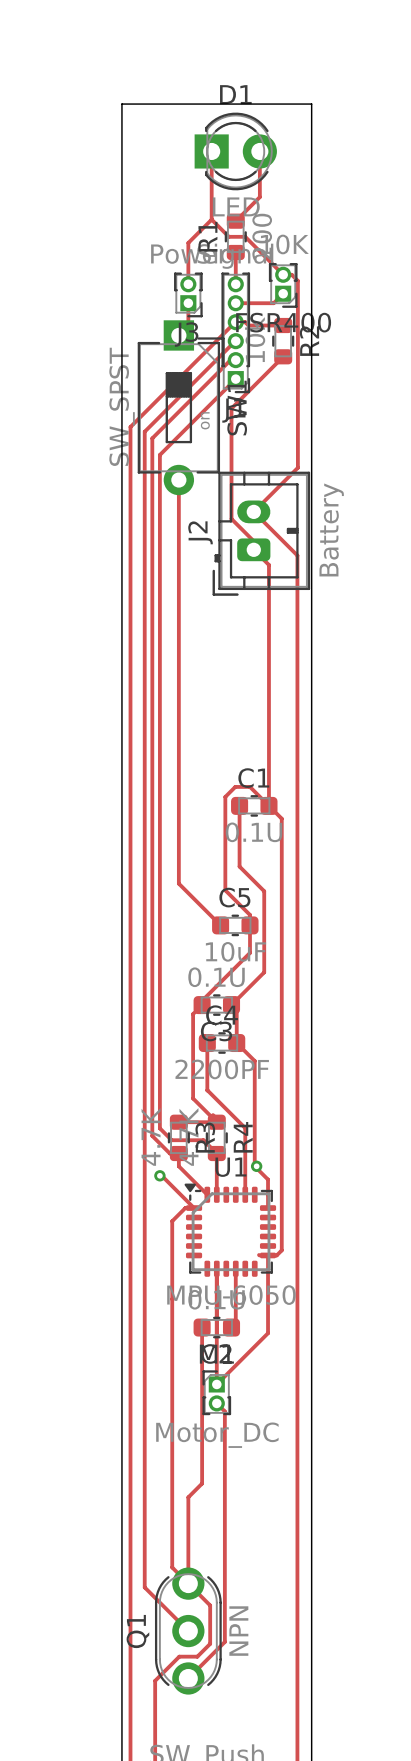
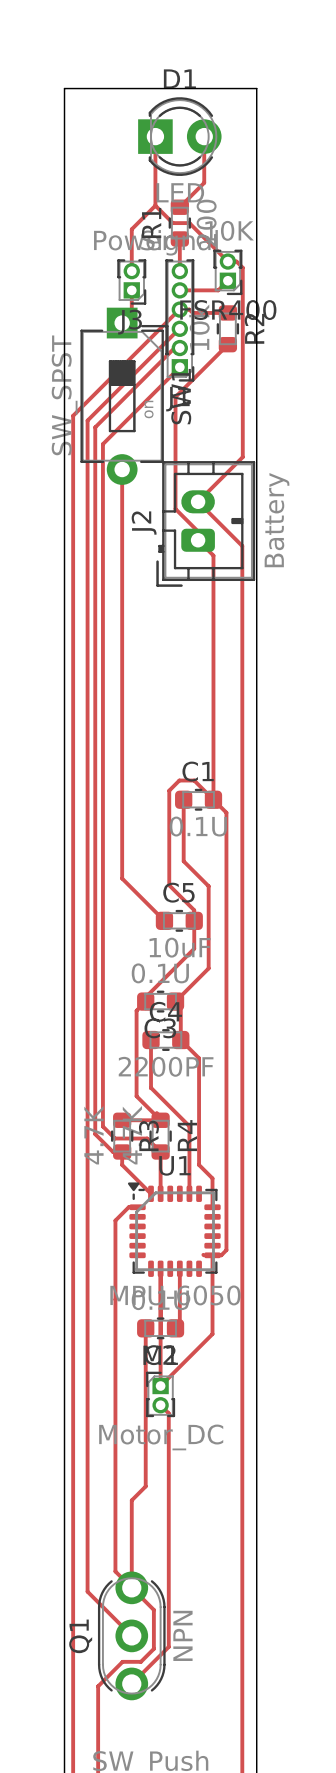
via: (256, 1166) -> none
track: (159, 1175) (194, 1208) -> none
via: (159, 1175) -> none

